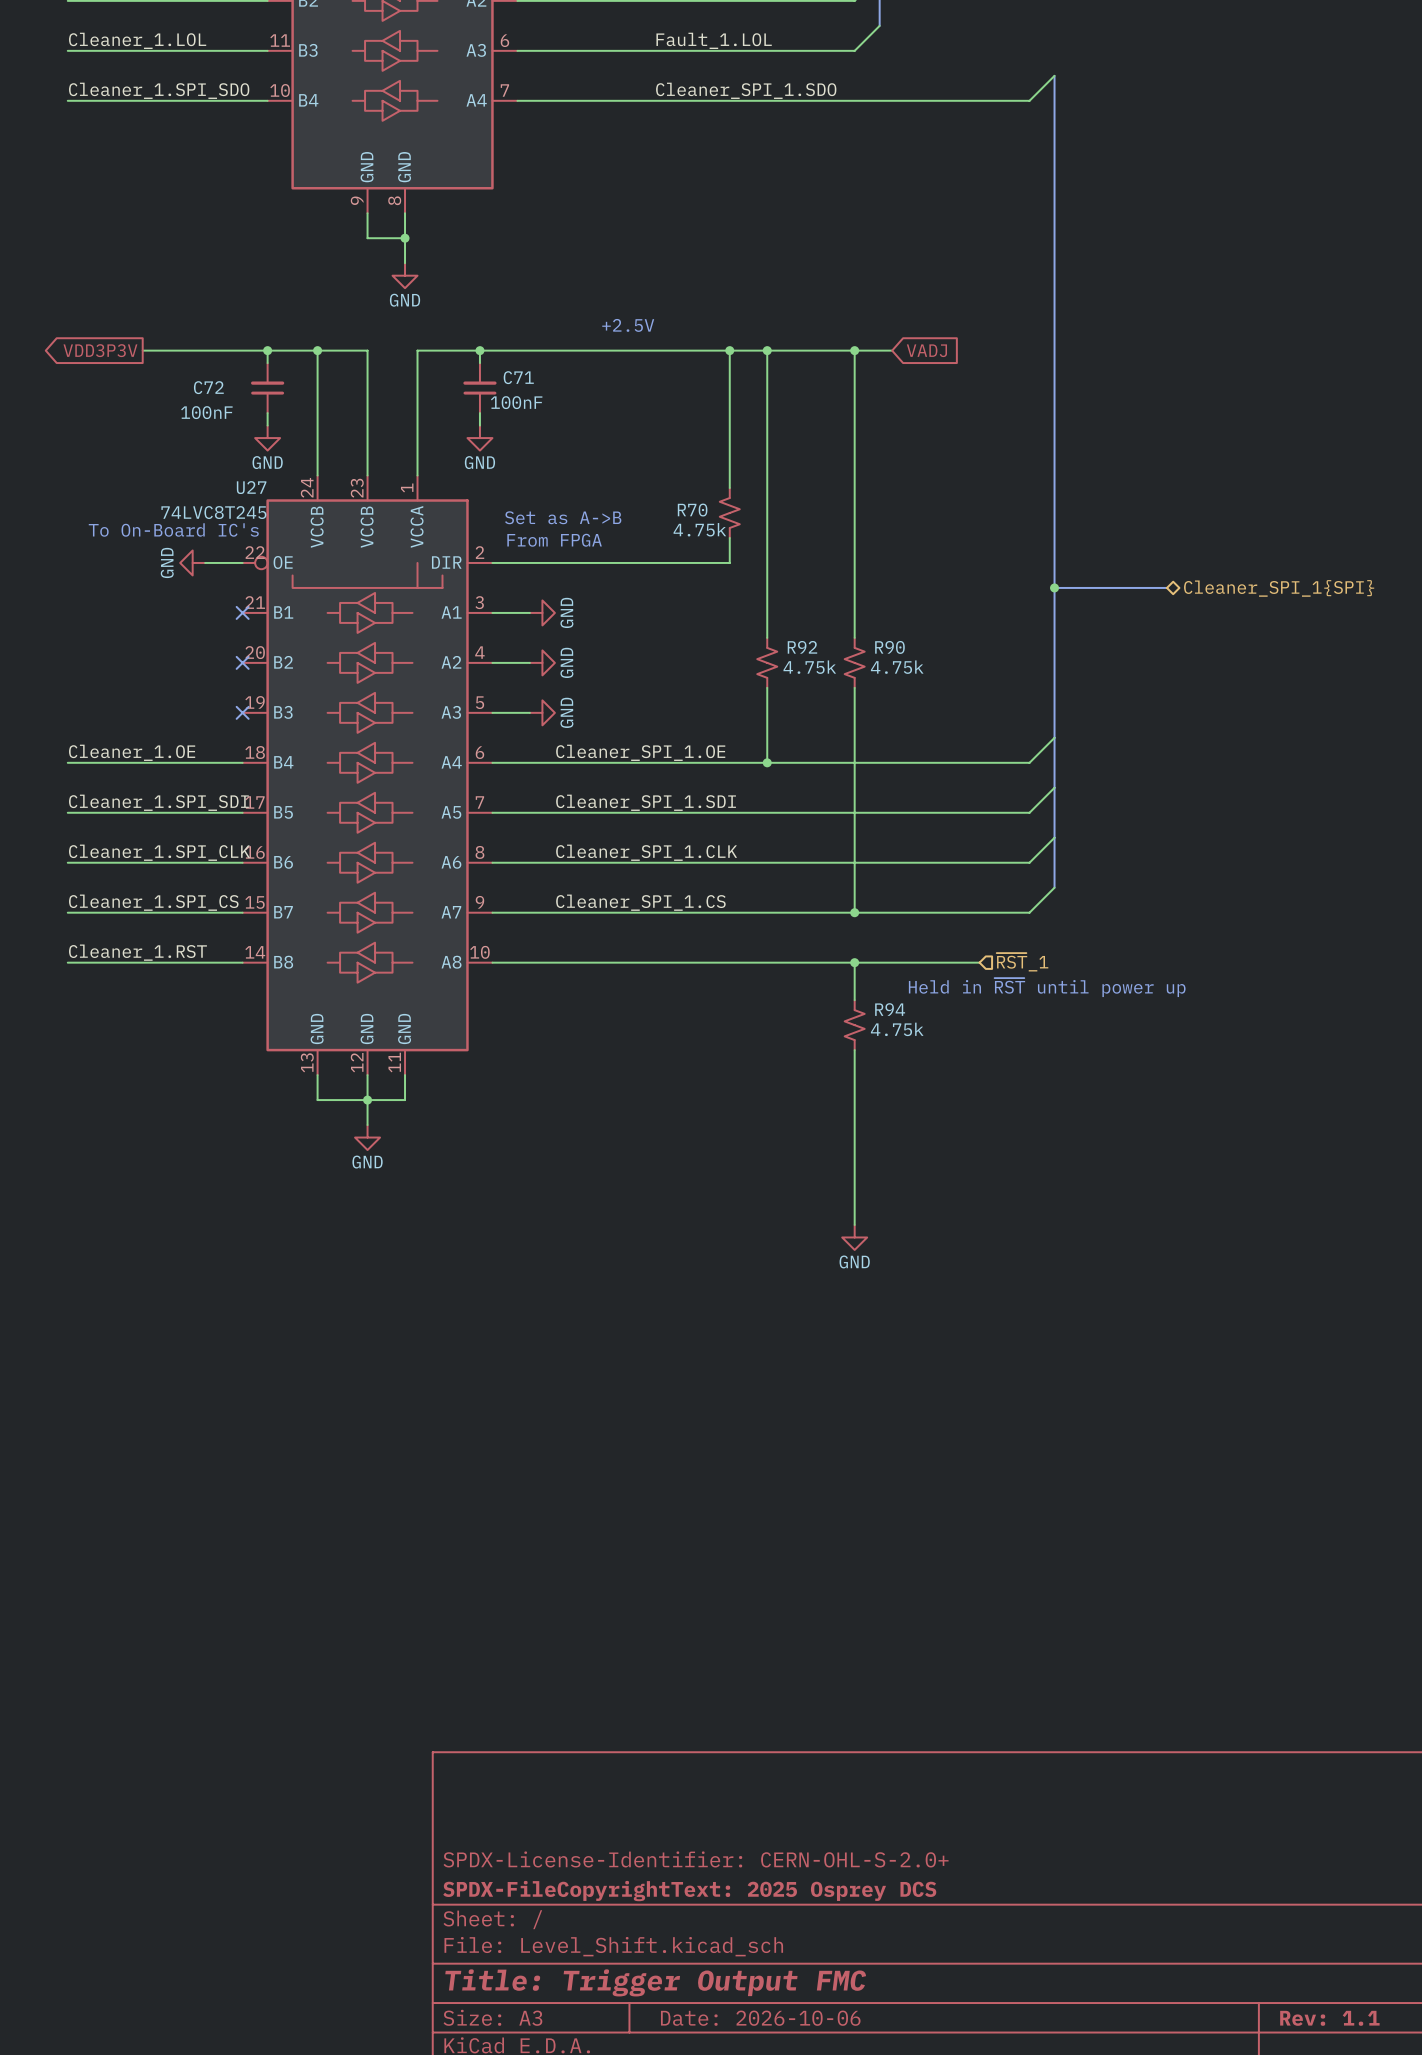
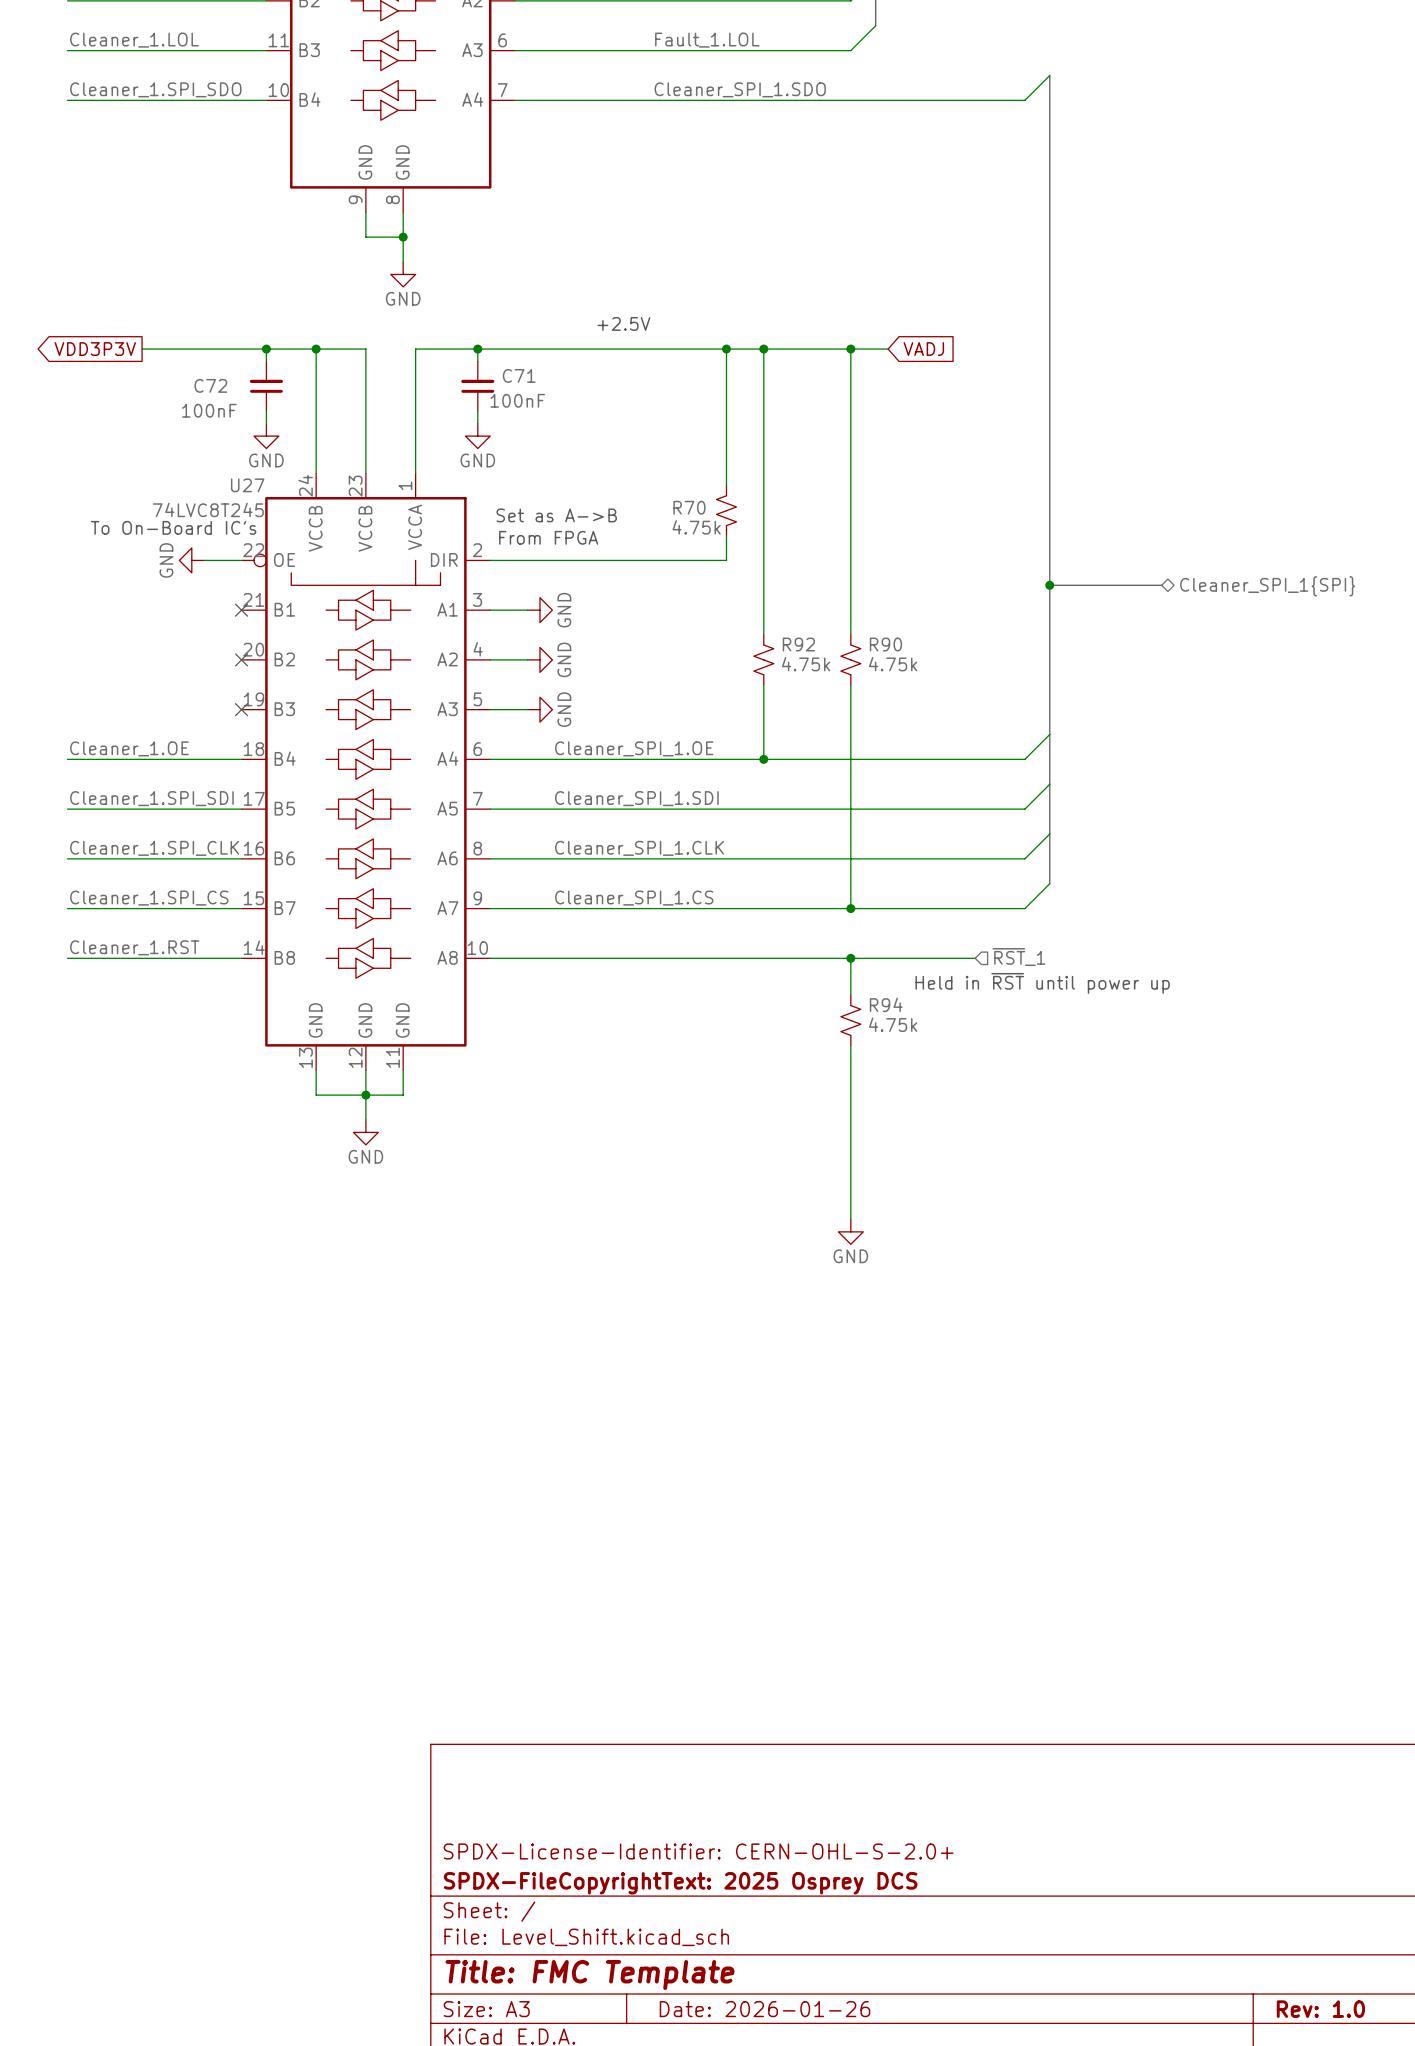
title block: Title: Trigger Output FMC (655, 1982) -> Title: FMC Template (590, 1974)
title block: Date: 2026-10-06 (760, 2018) -> Date: 2026-01-26 (765, 2009)
title block: Rev: 1.1 (1329, 2018) -> Rev: 1.0 (1320, 2009)

